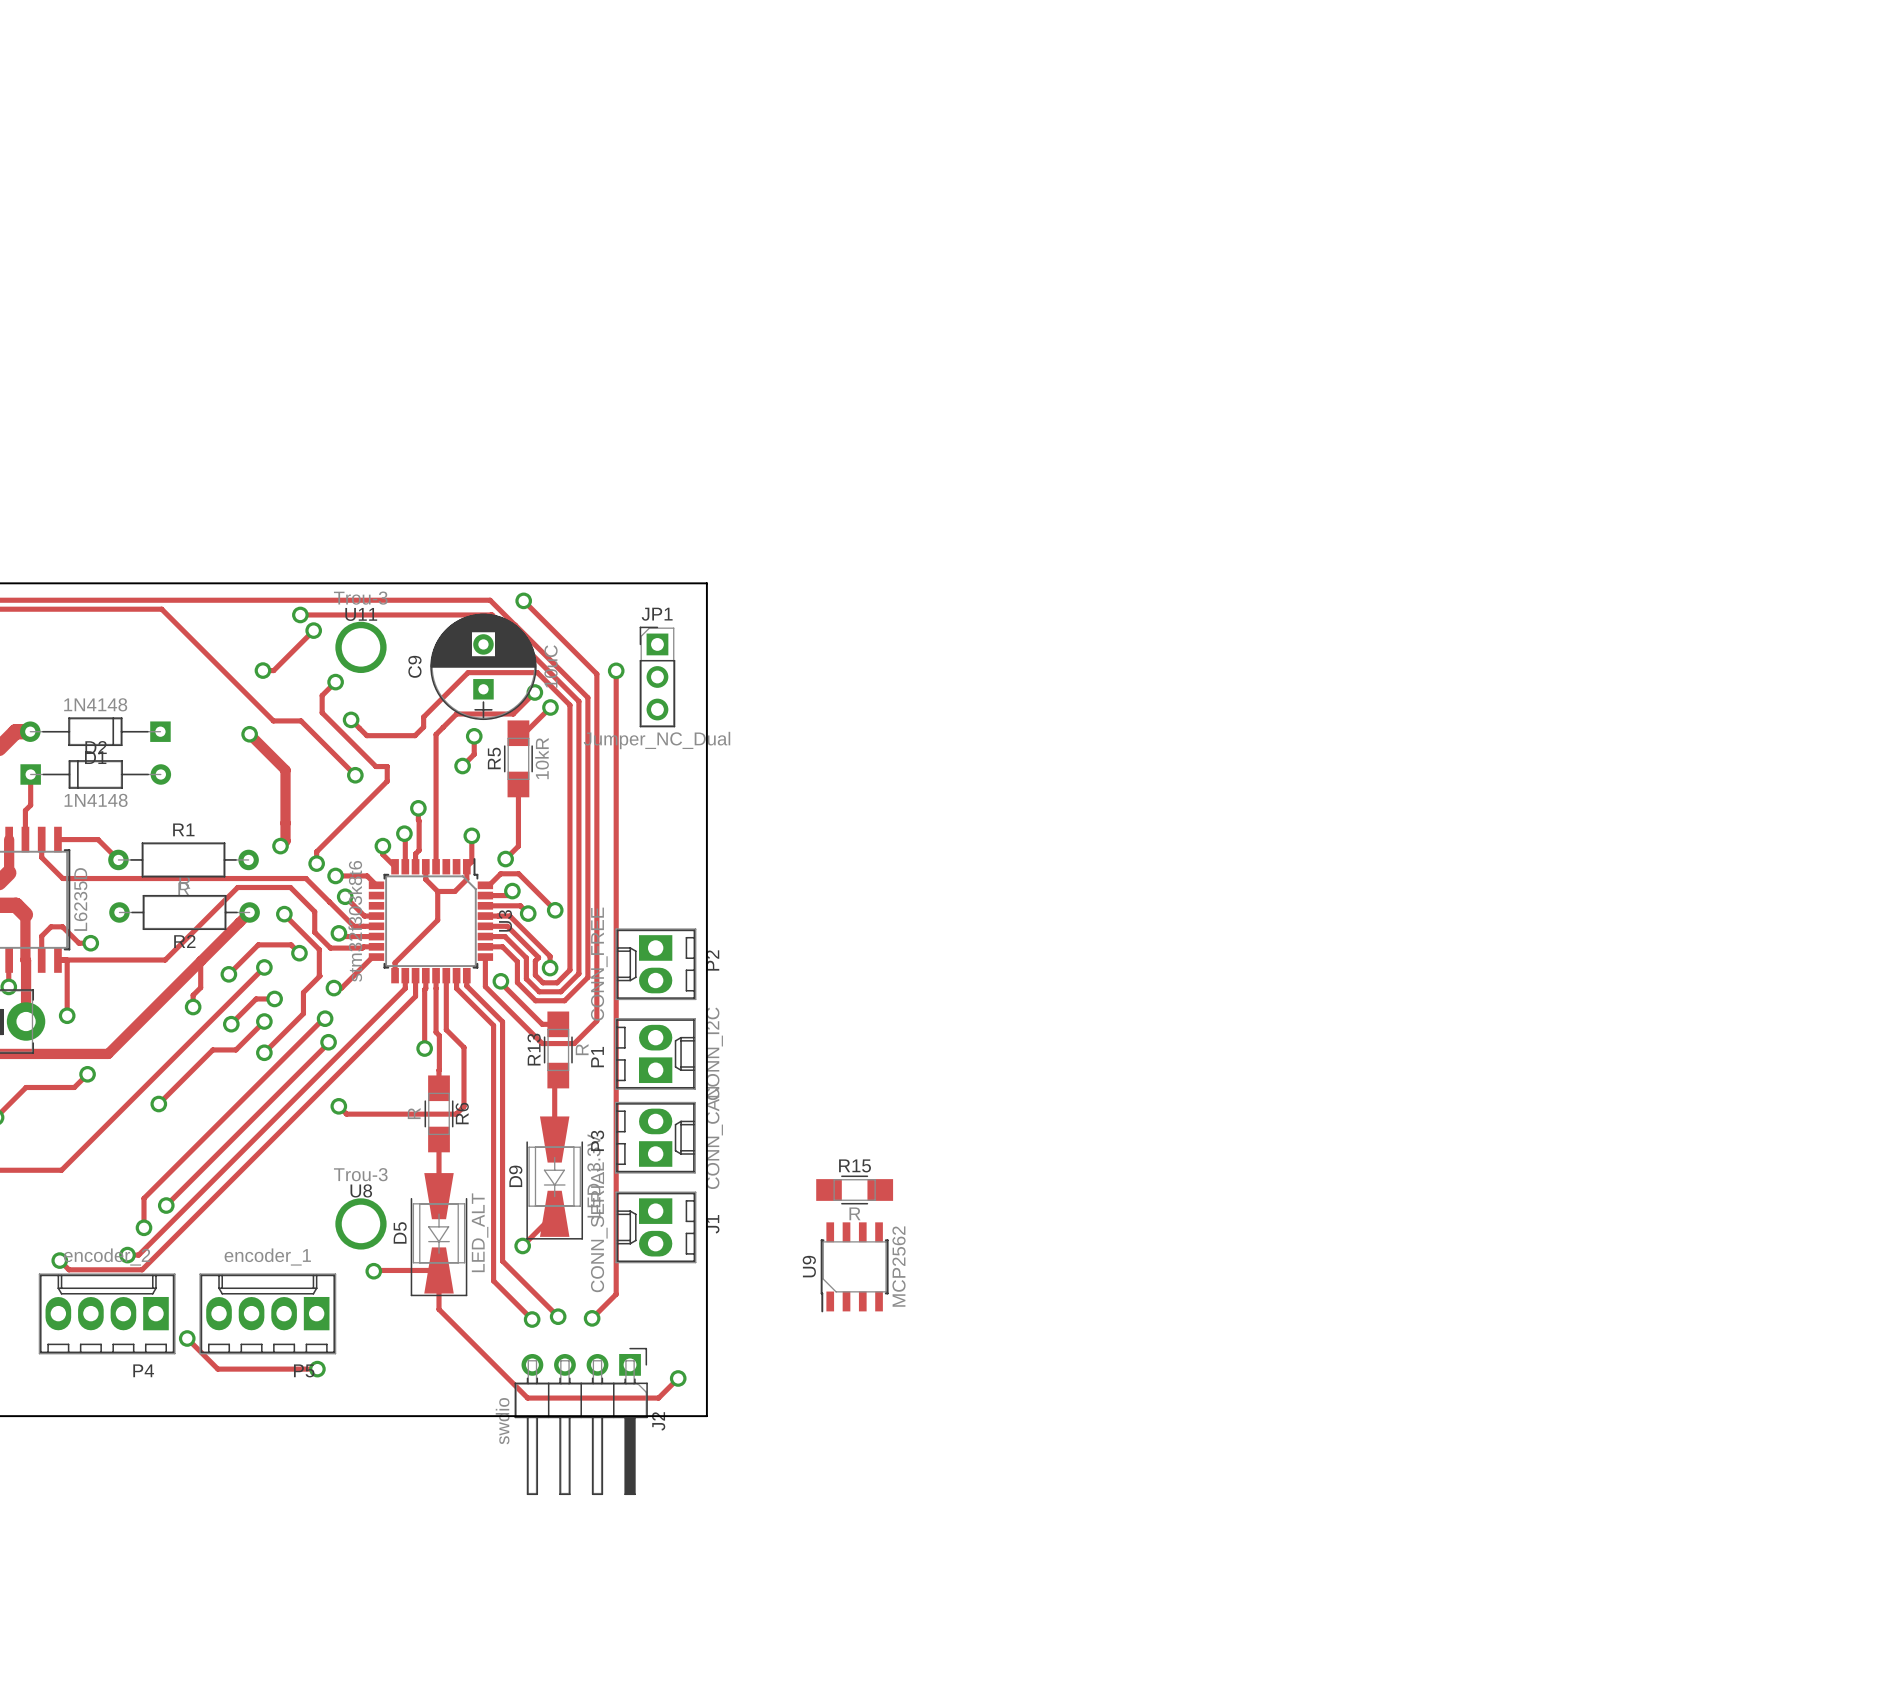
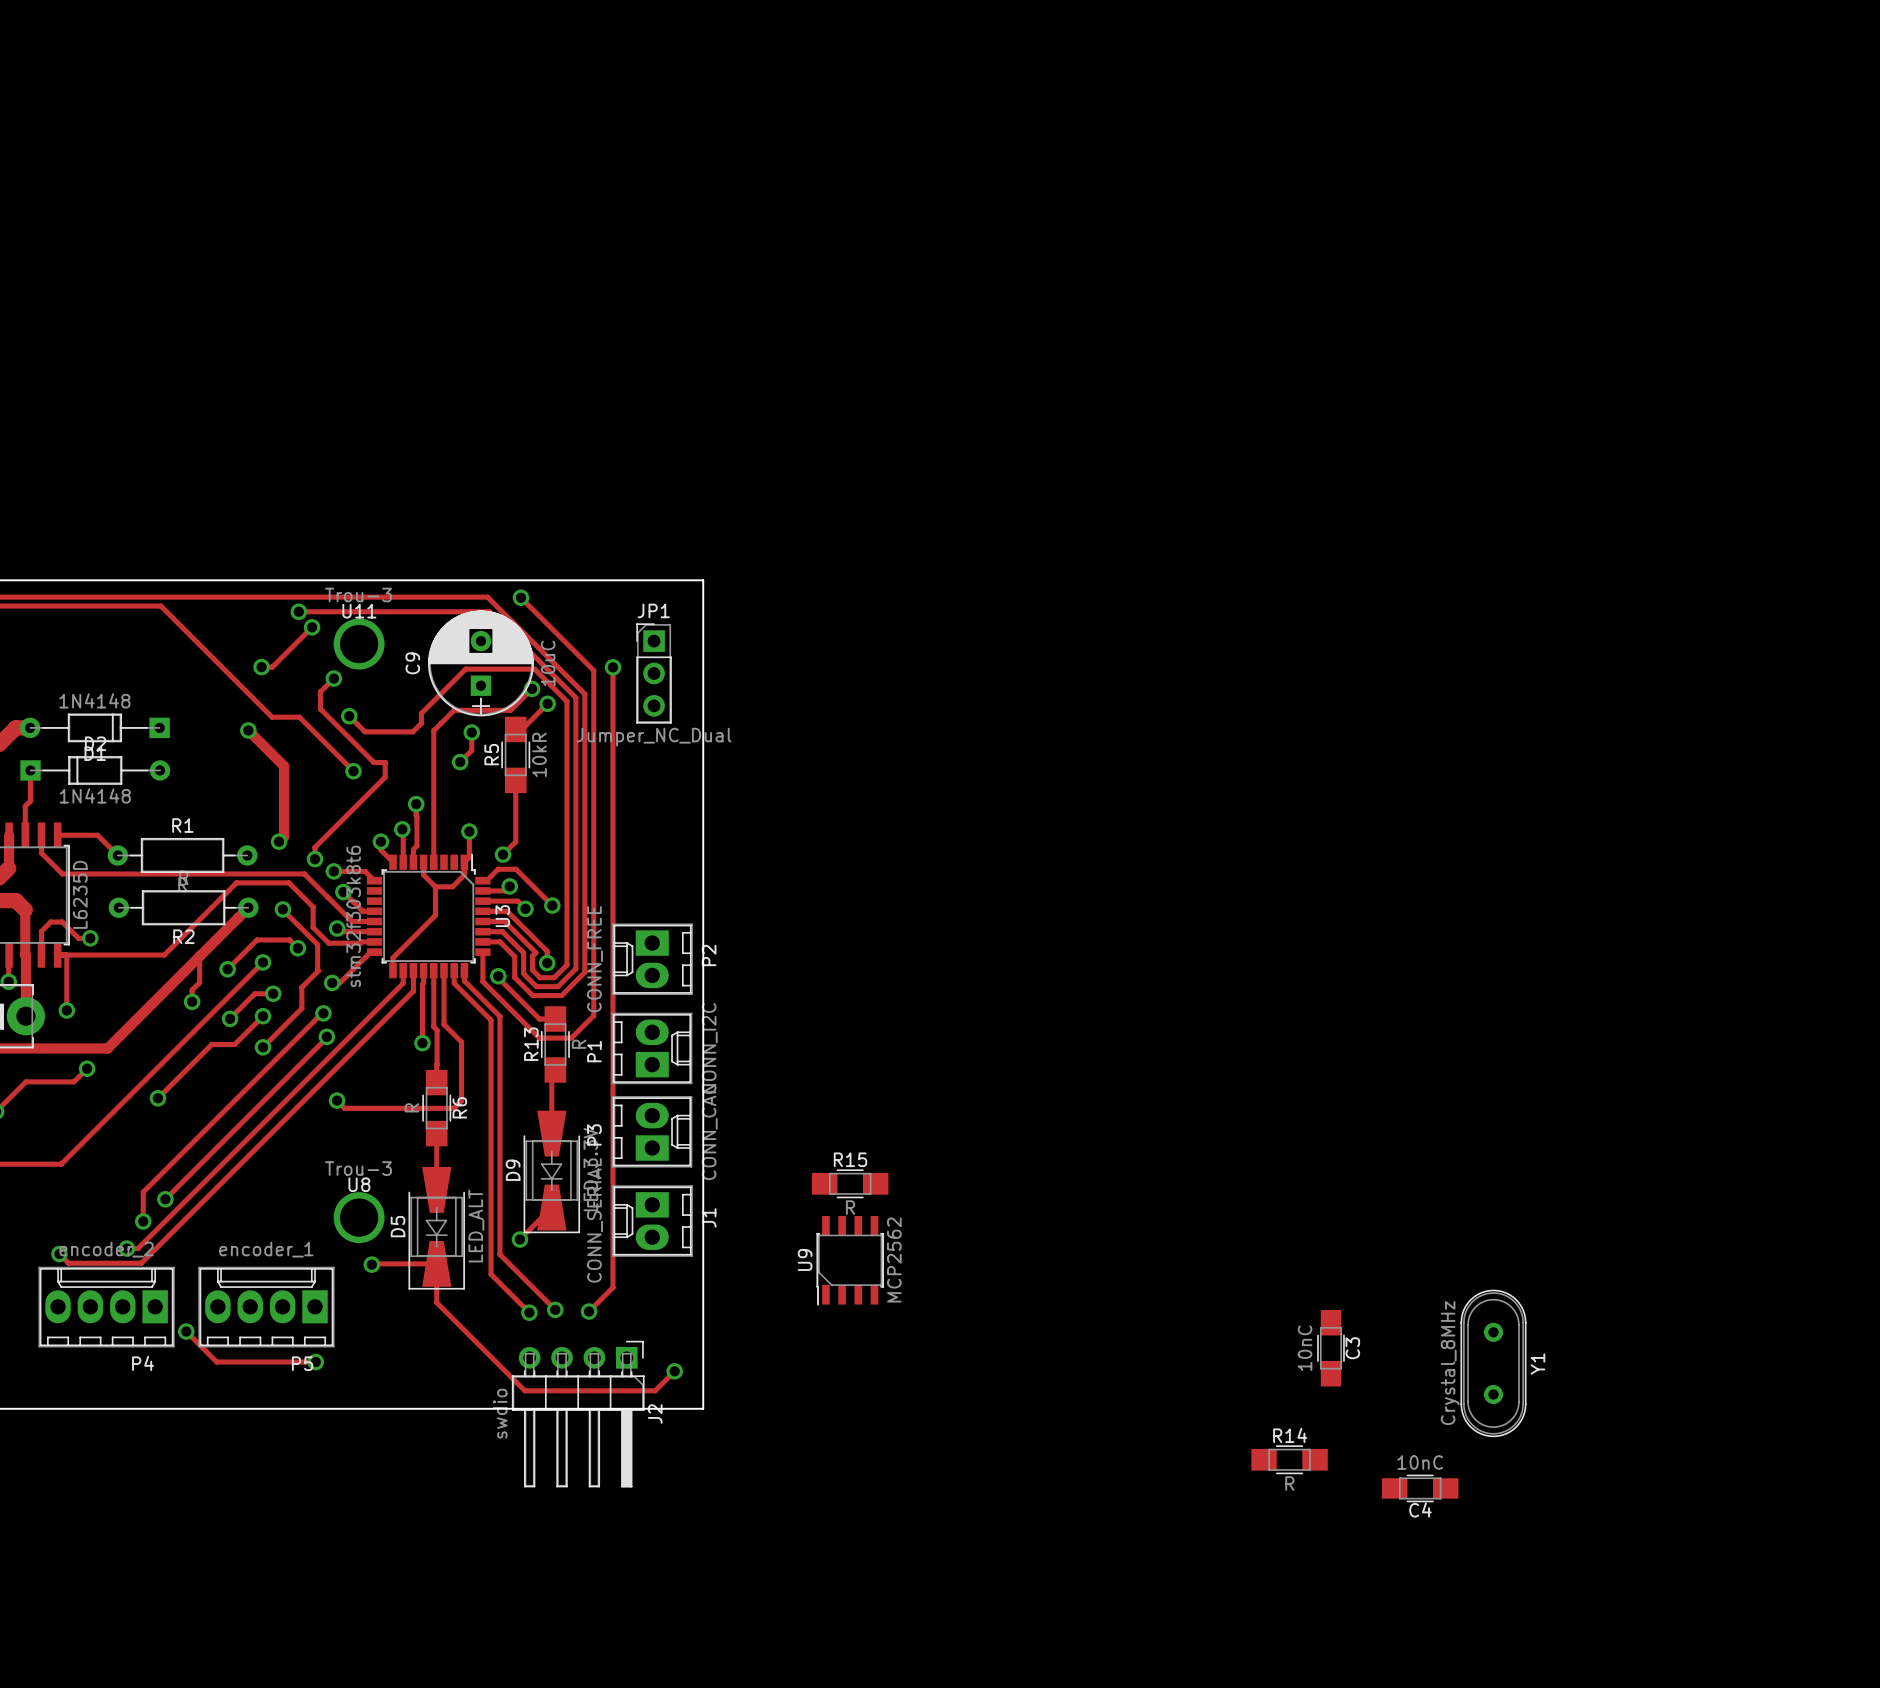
C3: none -> 10nC (1330, 1348)
Y1: none -> Crystal_8MHz (1493, 1363)
R14: none -> R (1289, 1459)
C4: none -> 10nC (1420, 1488)

